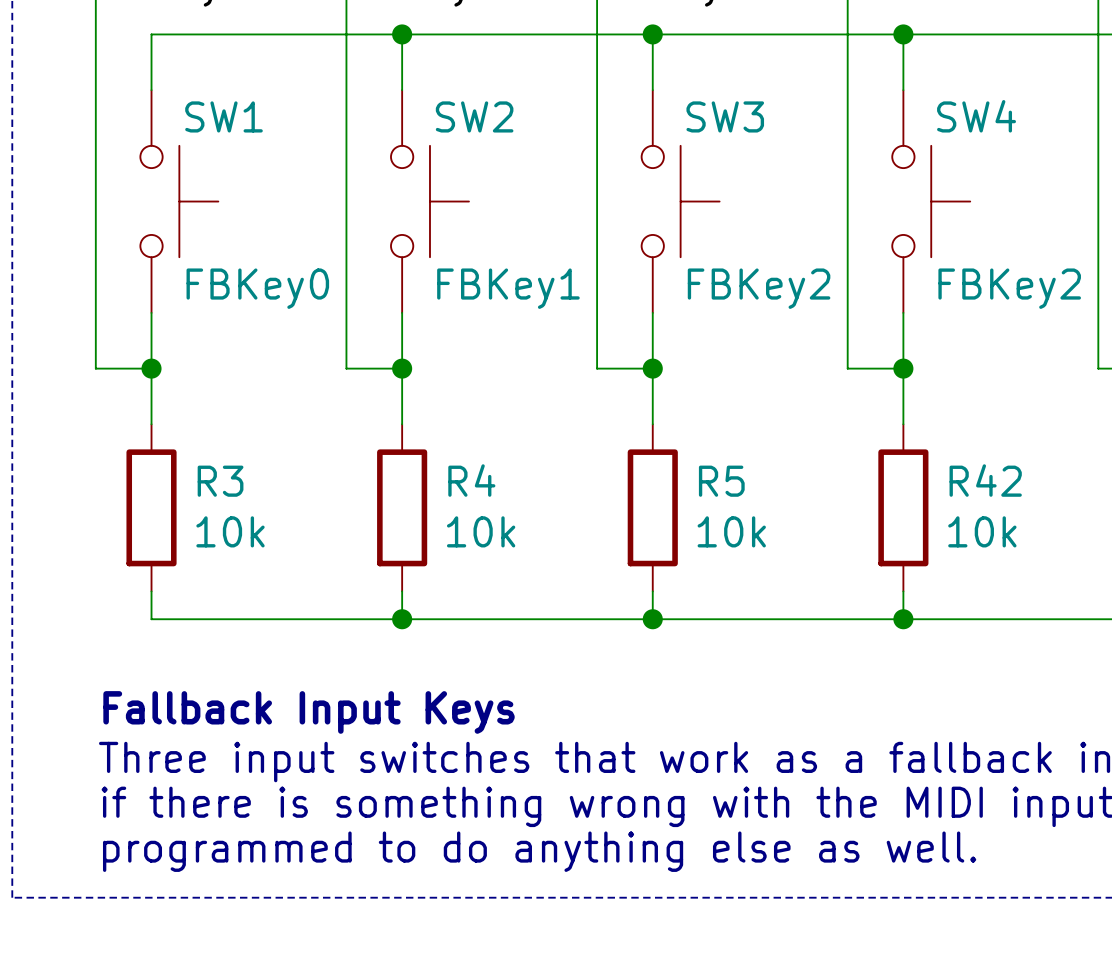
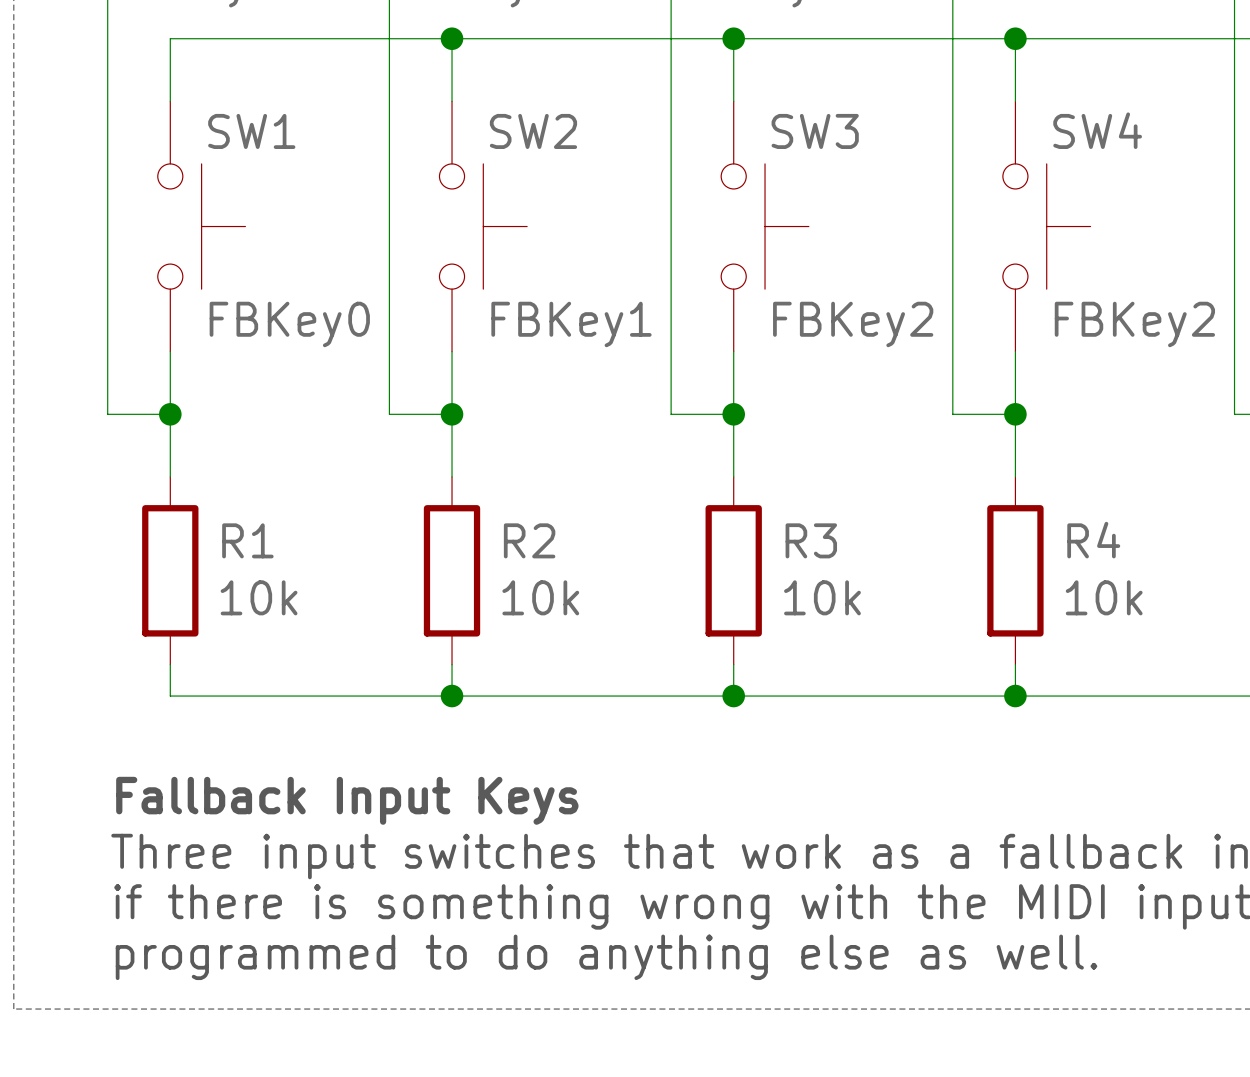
R4 name: R4 (471, 480) -> R2 (529, 540)
R42 name: R42 (985, 480) -> R4 (1093, 540)
R3 name: R3 (220, 481) -> R1 (247, 540)
R5 name: R5 (721, 481) -> R3 (811, 540)

